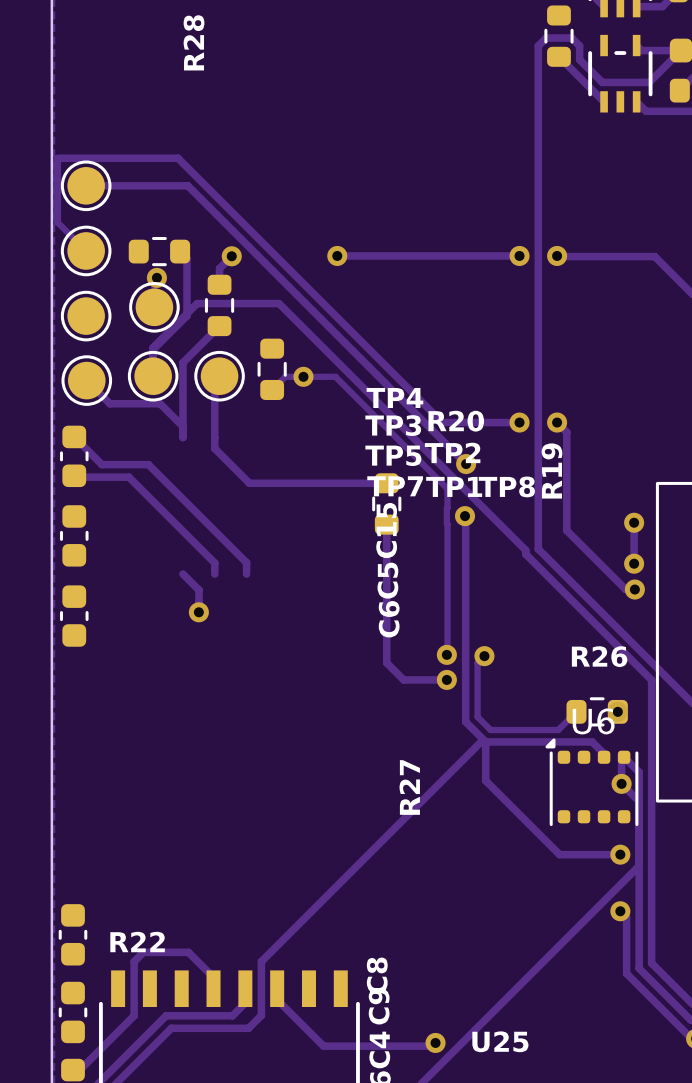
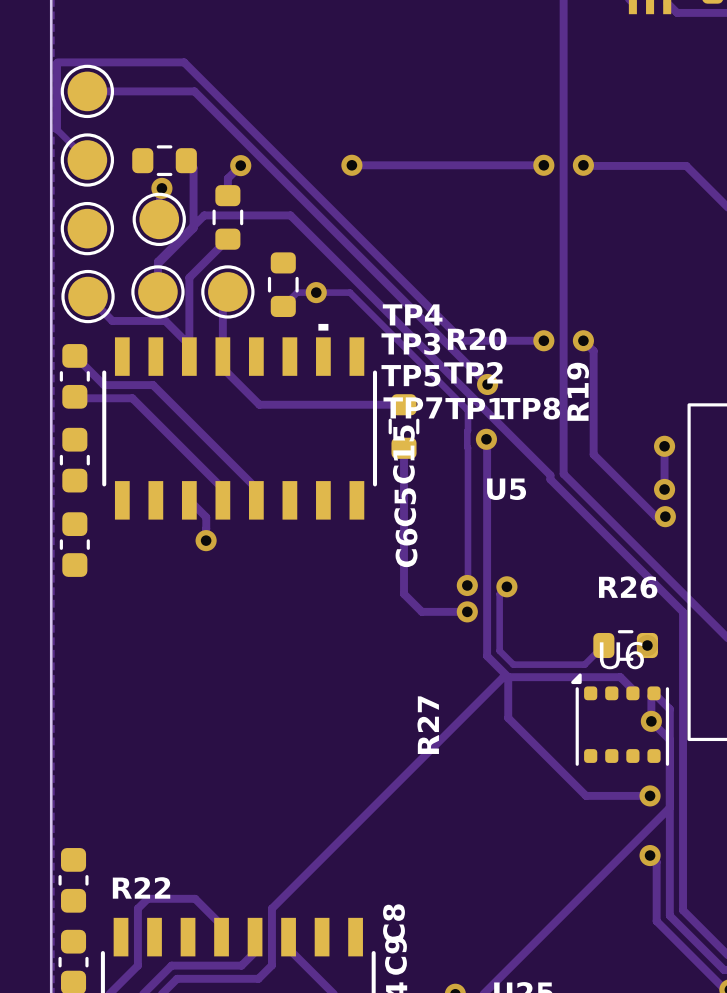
U5: none -> (239, 421)

